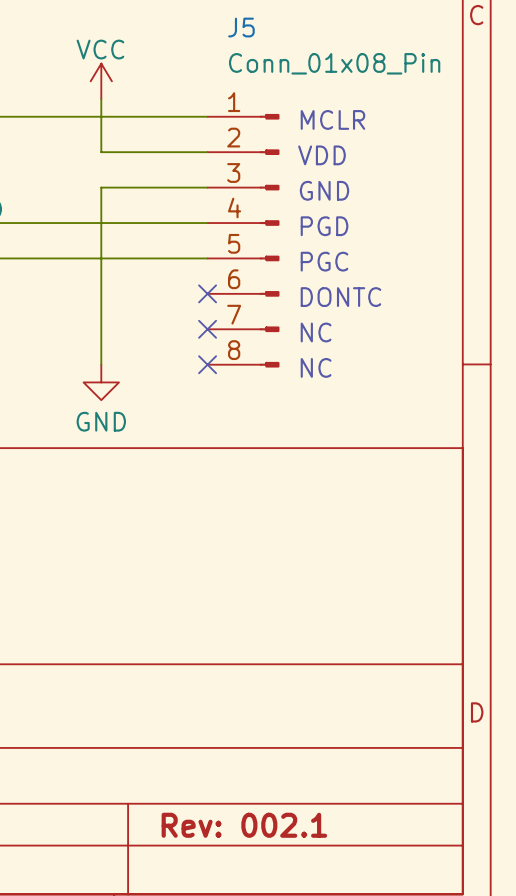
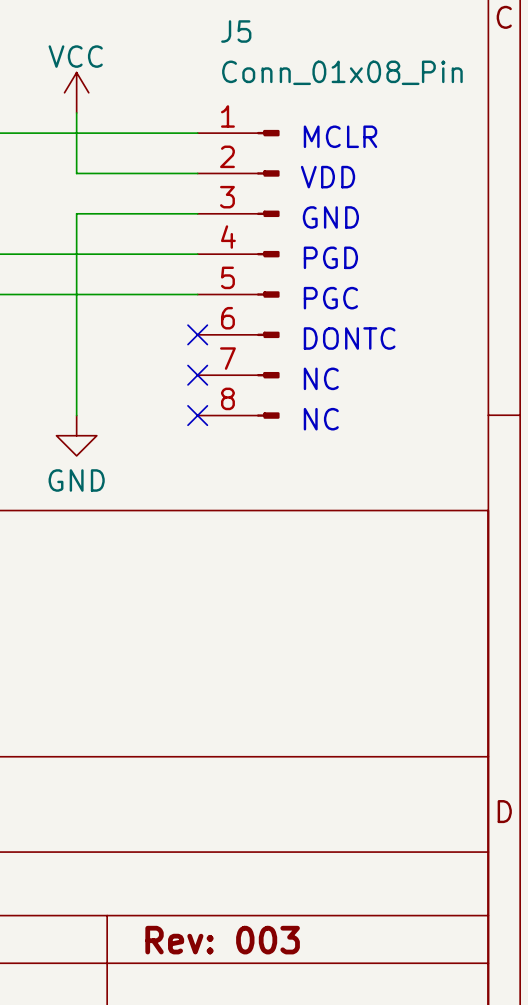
title block: Rev: 002.1 (244, 825) -> Rev: 003 (222, 940)

